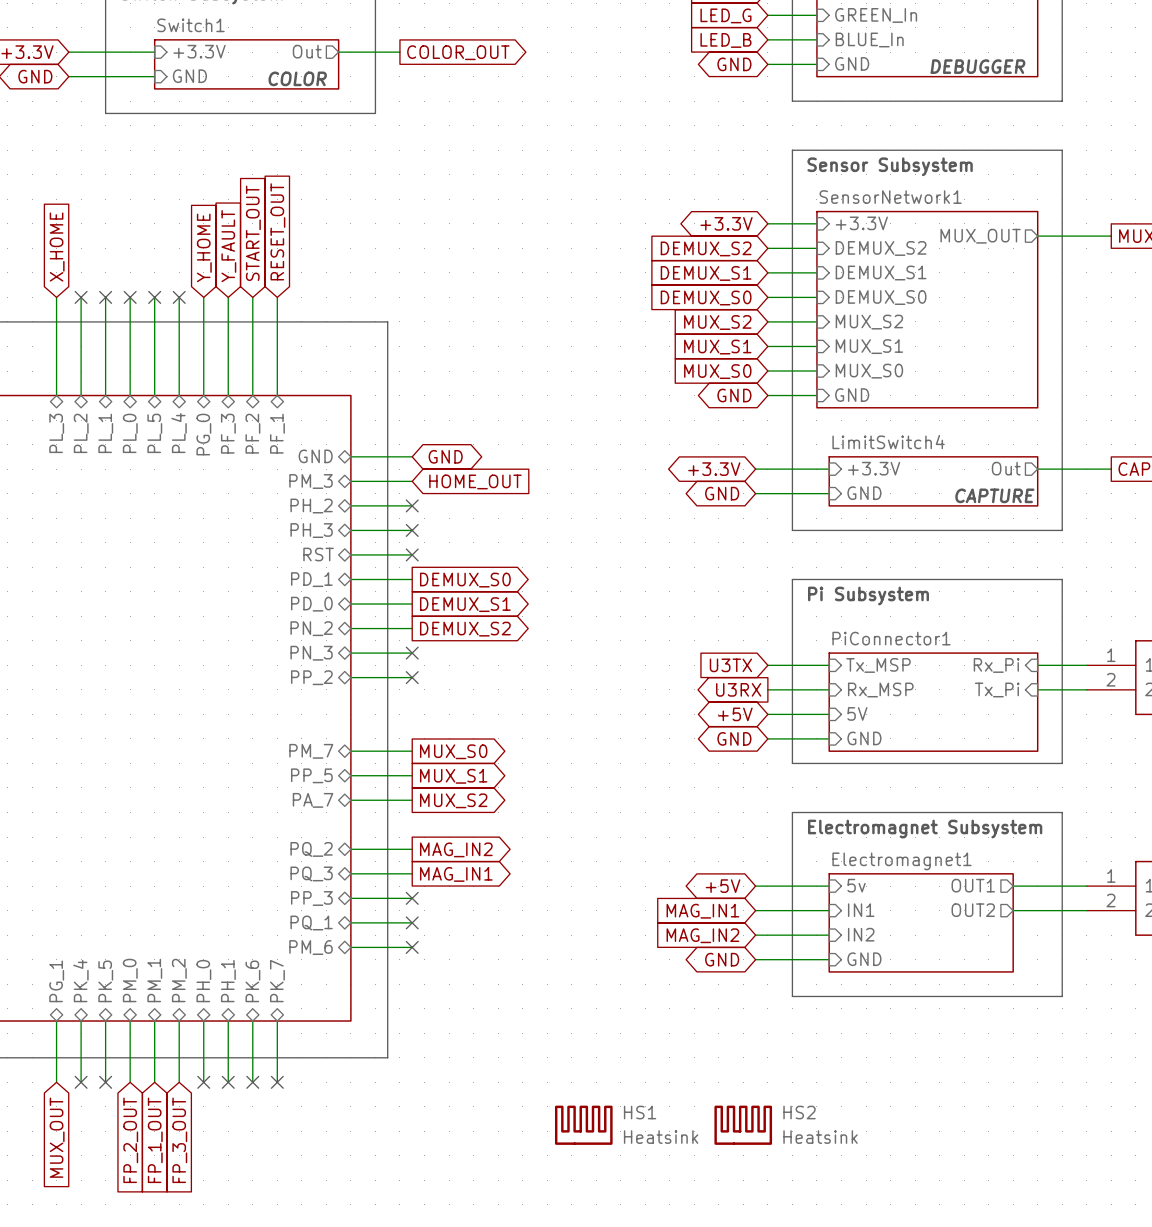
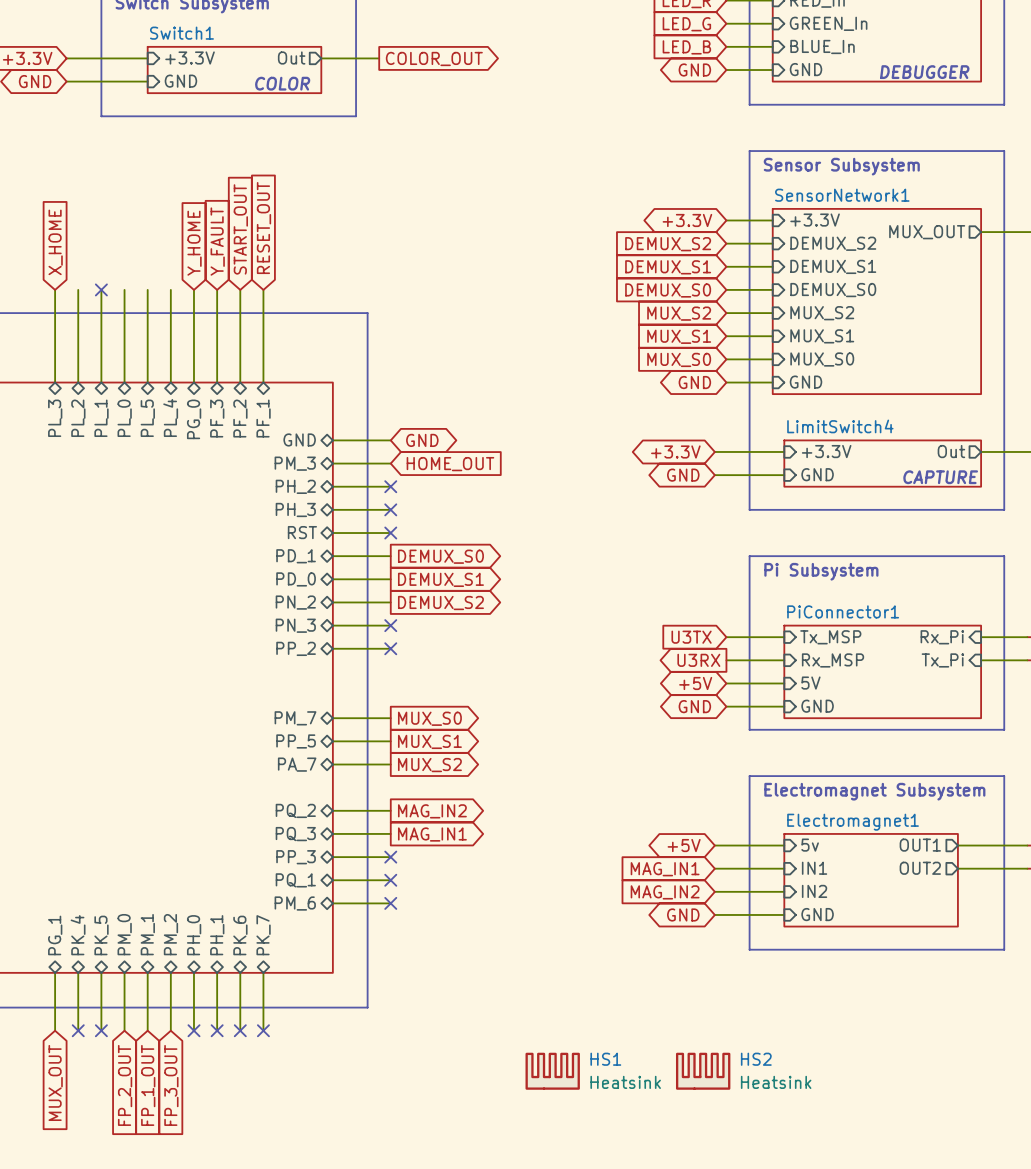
no-connect mark: (81, 297) -> none
no-connect mark: (130, 297) -> none
no-connect mark: (154, 297) -> none
no-connect mark: (179, 297) -> none

